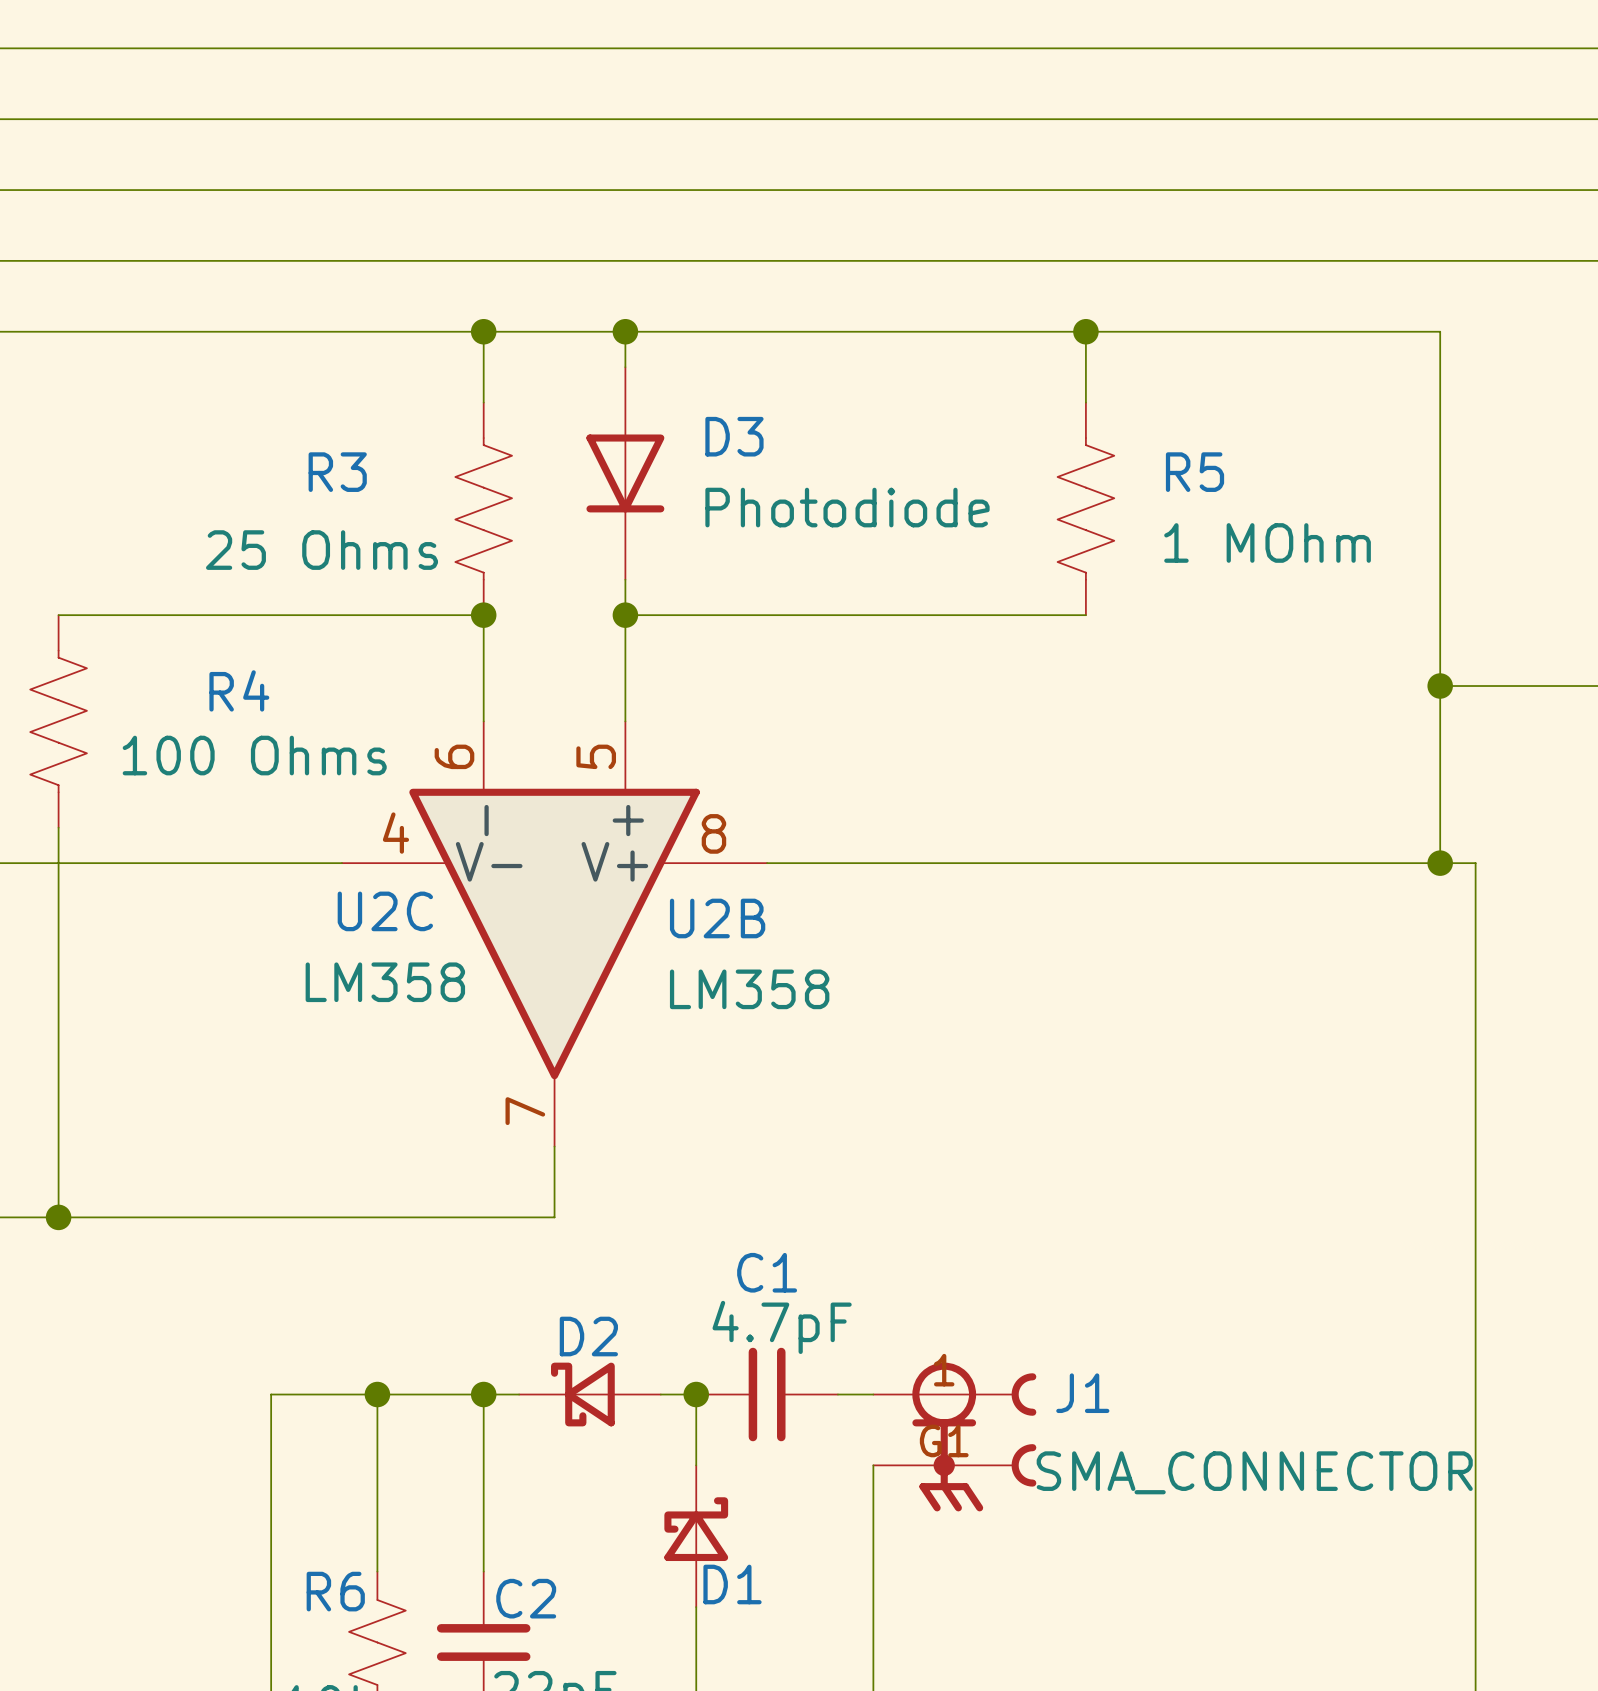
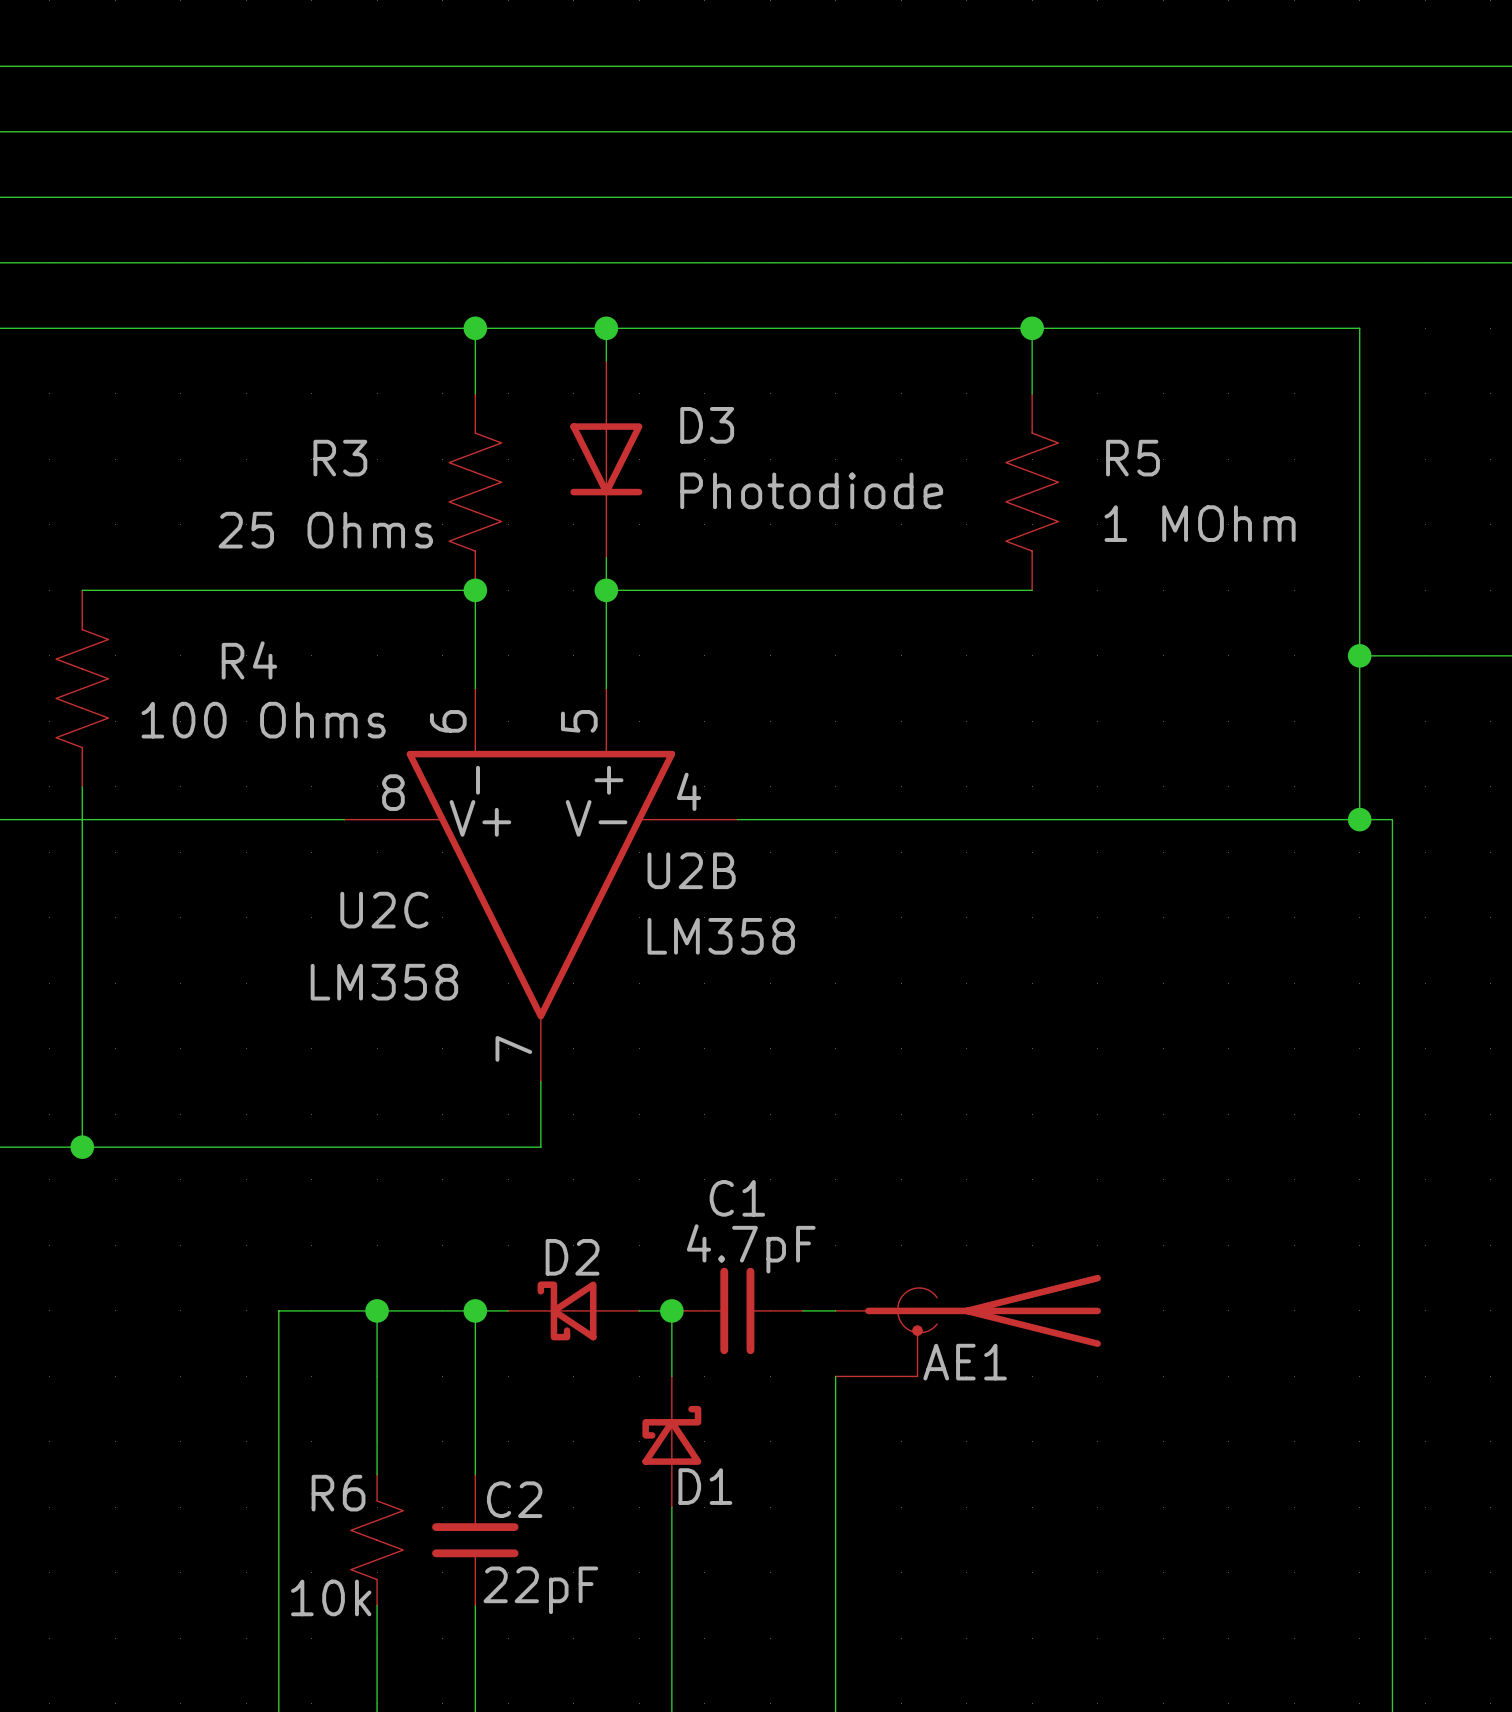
U2C rotation: 0° (554, 863) -> 180° (540, 819)
U2C value position: LM358 (385, 982) -> LM358 (384, 982)
AE1: none -> (968, 1325)
J1: SMA_CONNECTOR (954, 1437) -> none

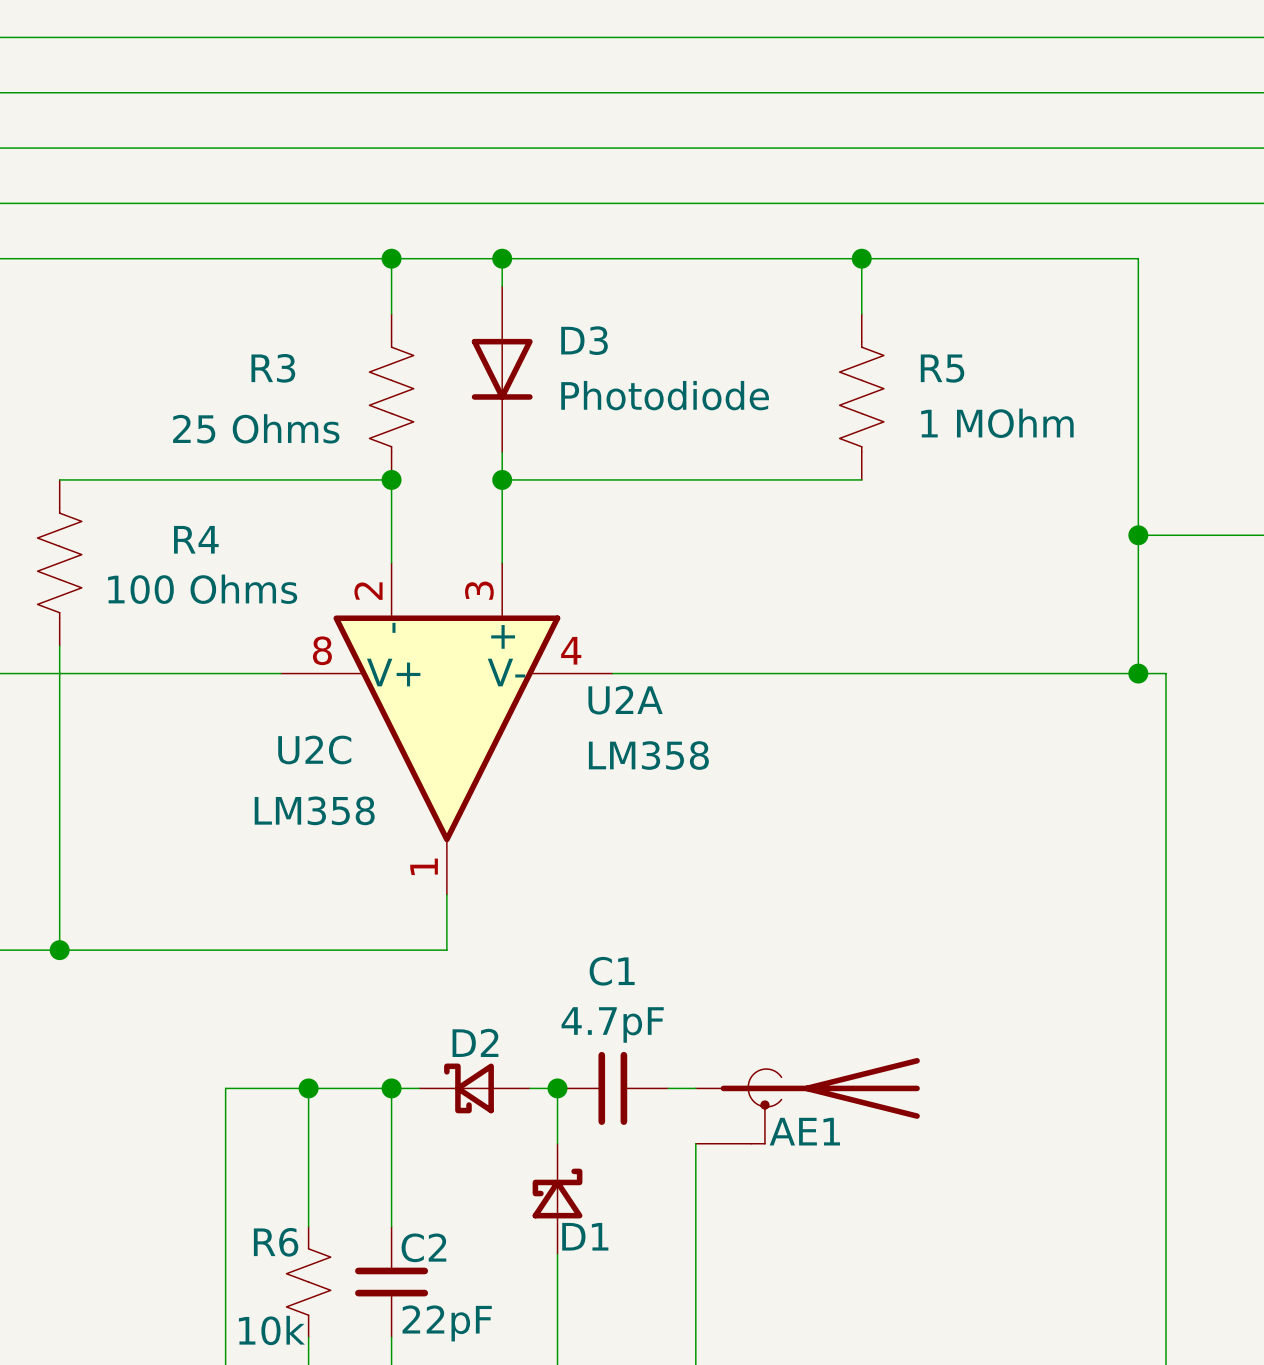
U2B pin number: 6 (448, 721) -> 2 (368, 591)
U2B pin number: 5 (579, 721) -> 3 (479, 590)
U2B name: U2B (691, 870) -> U2A (625, 700)
U2B value position: LM358 (721, 936) -> LM358 (648, 755)
U2B pin number: 7 (513, 1048) -> 1 (424, 866)
C1 name position: C1 (737, 1198) -> C1 (612, 971)
C1 value position: 4.7pF (751, 1248) -> 4.7pF (612, 1024)

